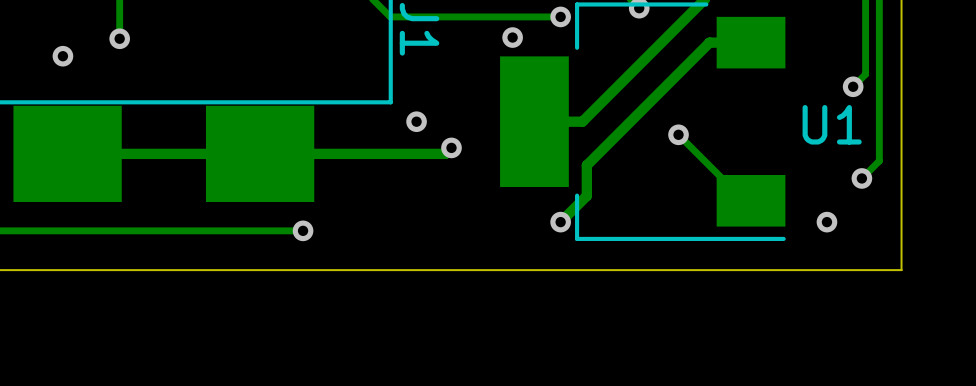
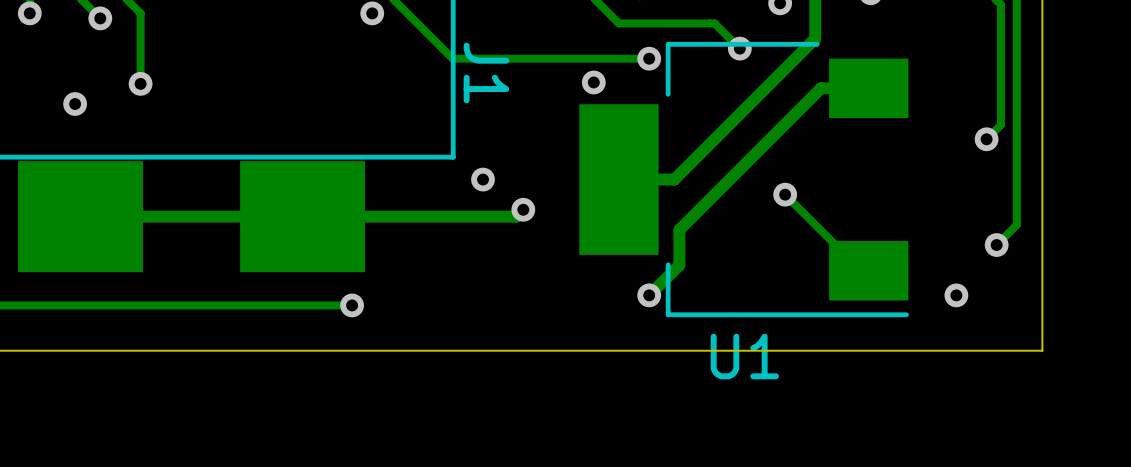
U1 name position: U1 (832, 124) -> U1 (744, 356)

